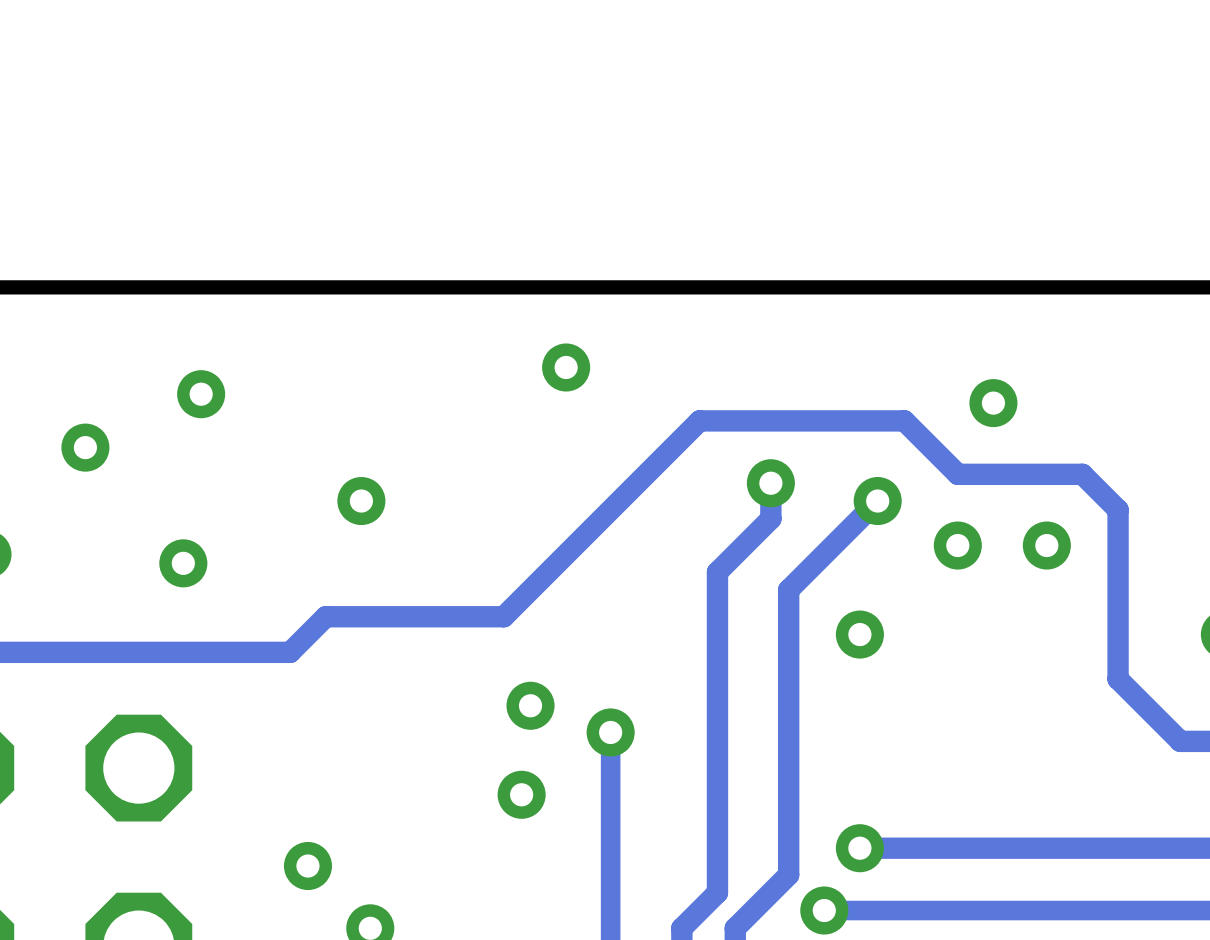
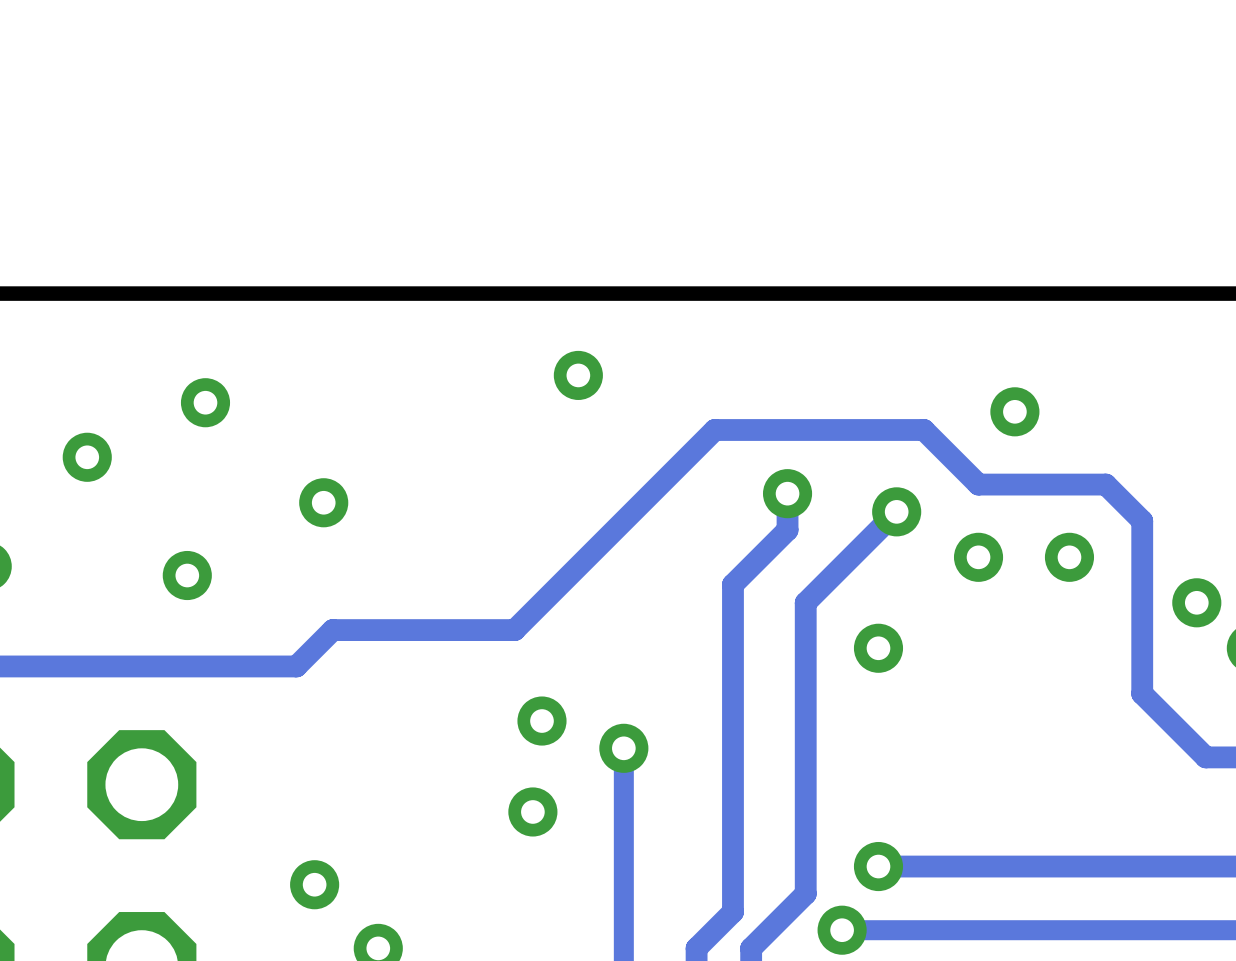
via position: (361, 501) -> (323, 502)
via: none -> (1196, 602)

